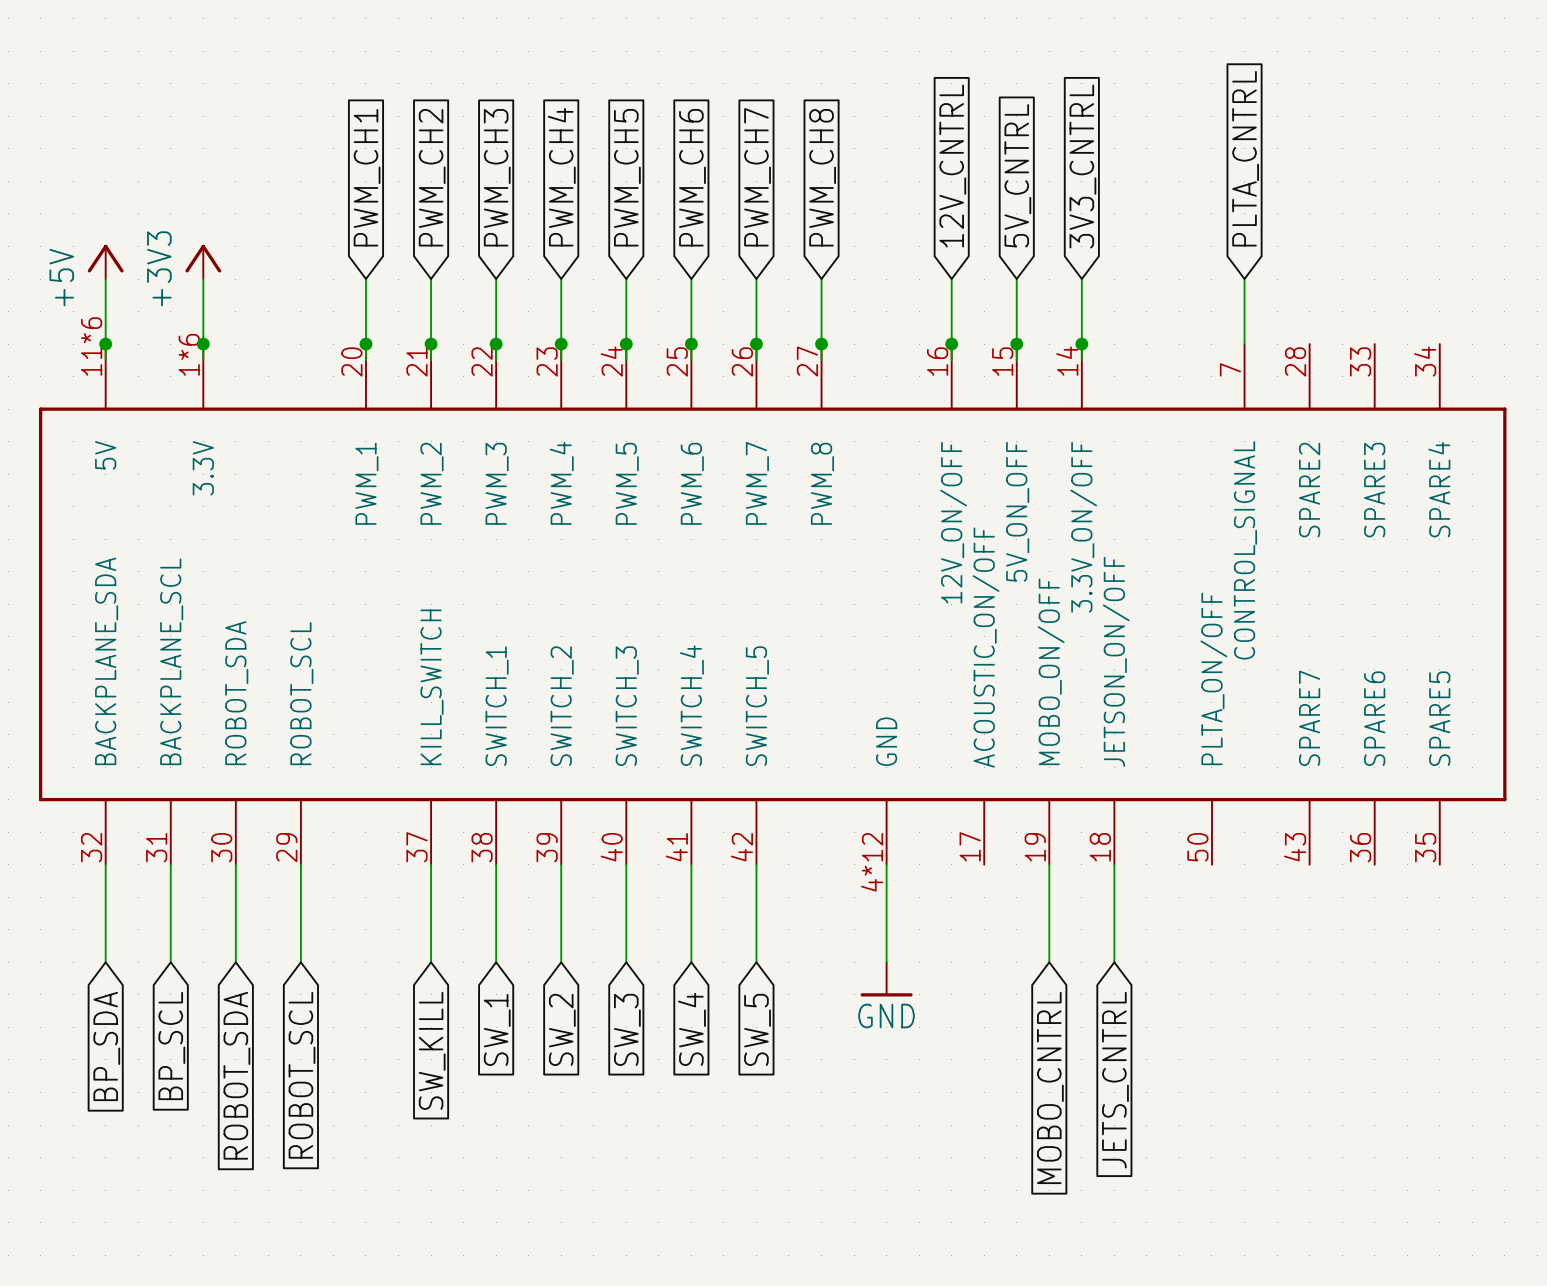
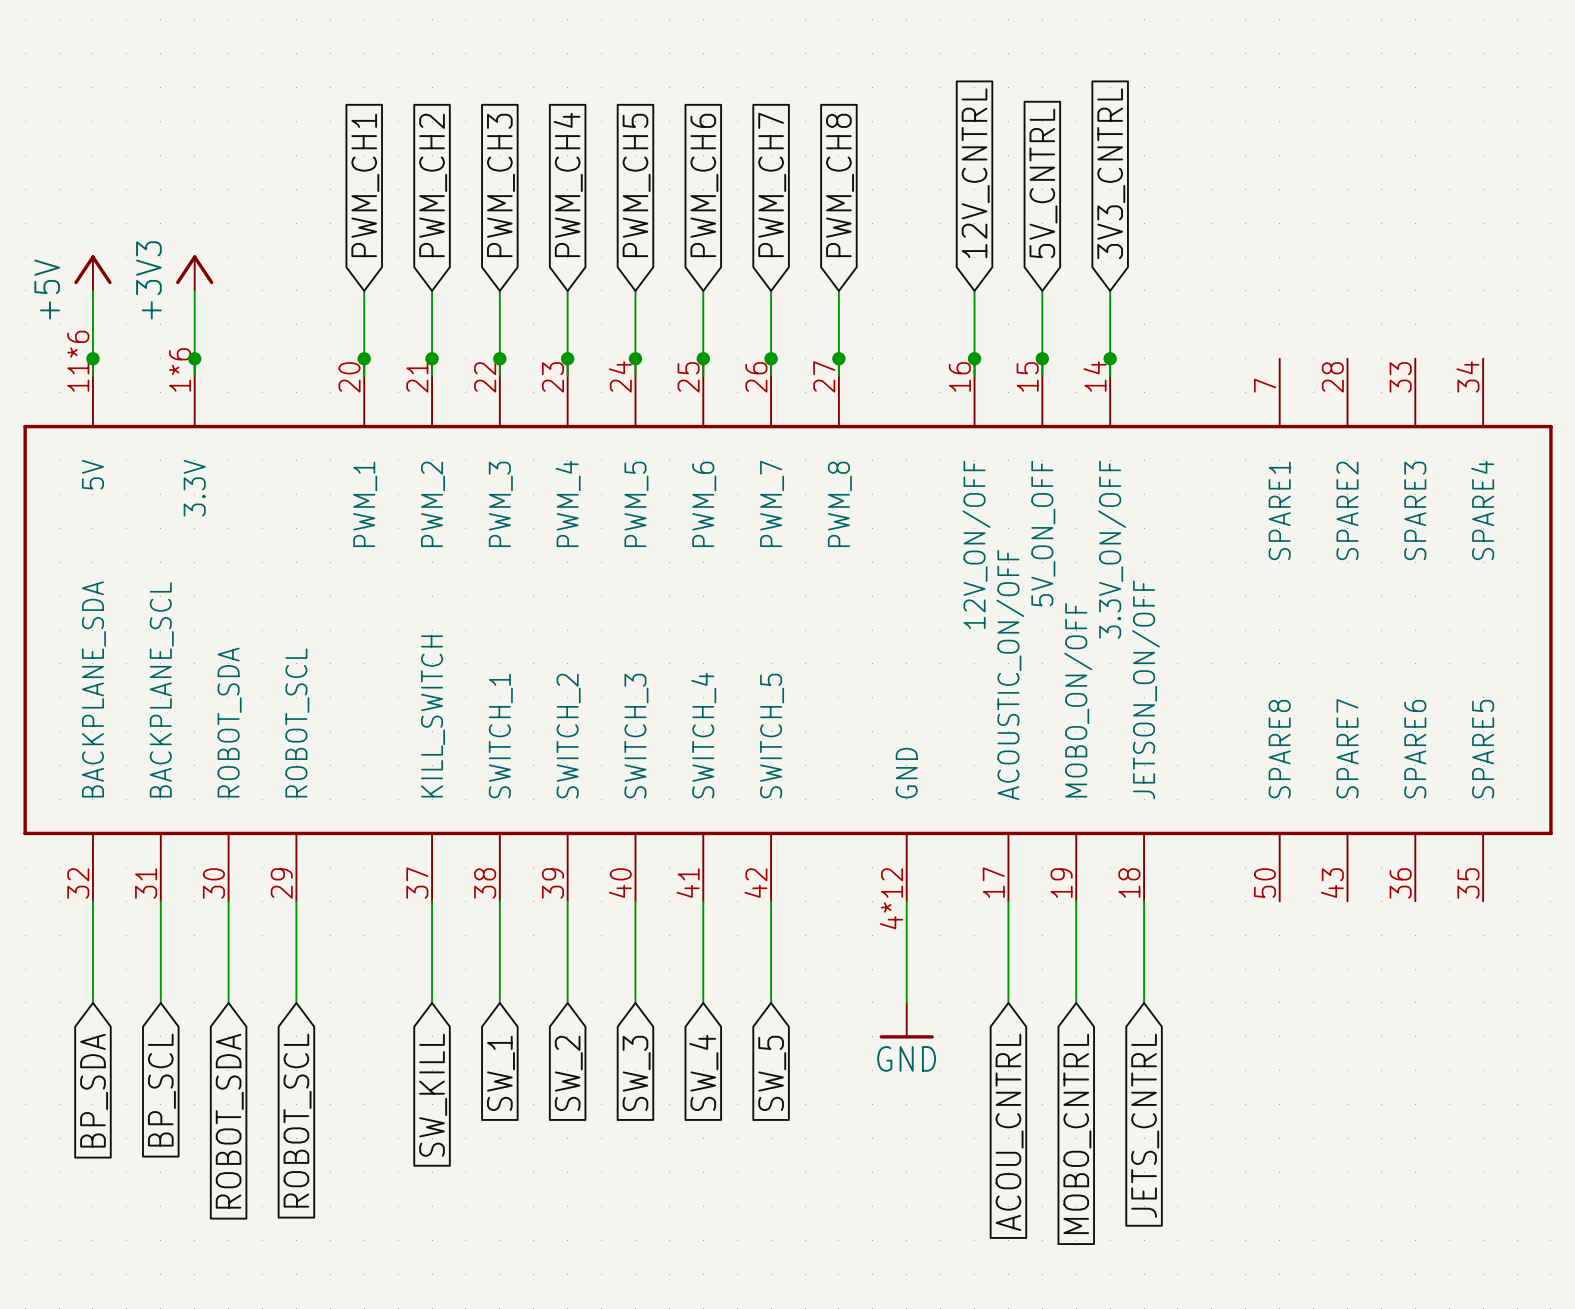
global label: PLTA_CNTRL (1245, 158) -> none
wire: (1244, 279) (1244, 344) -> none
part symbol: [38, 344, 1507, 865] -> [23, 358, 1553, 902]
wire: none -> (1008, 901) (1008, 1002)
global label: none -> ACOU_CNTRL (1009, 1132)

